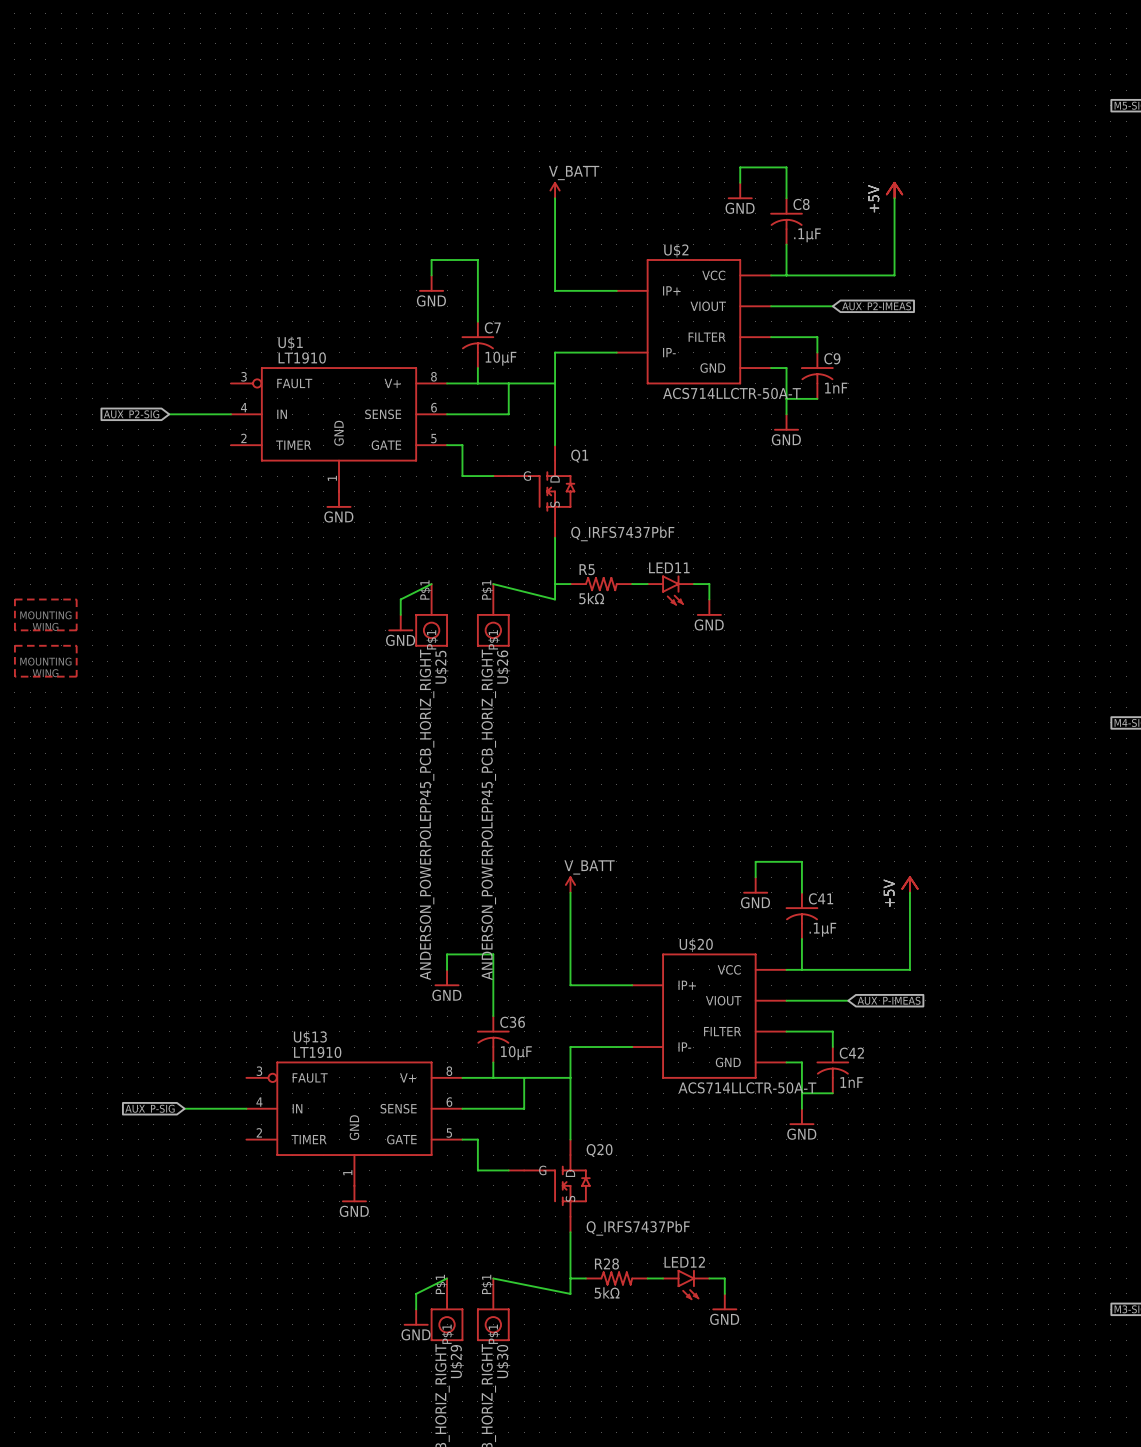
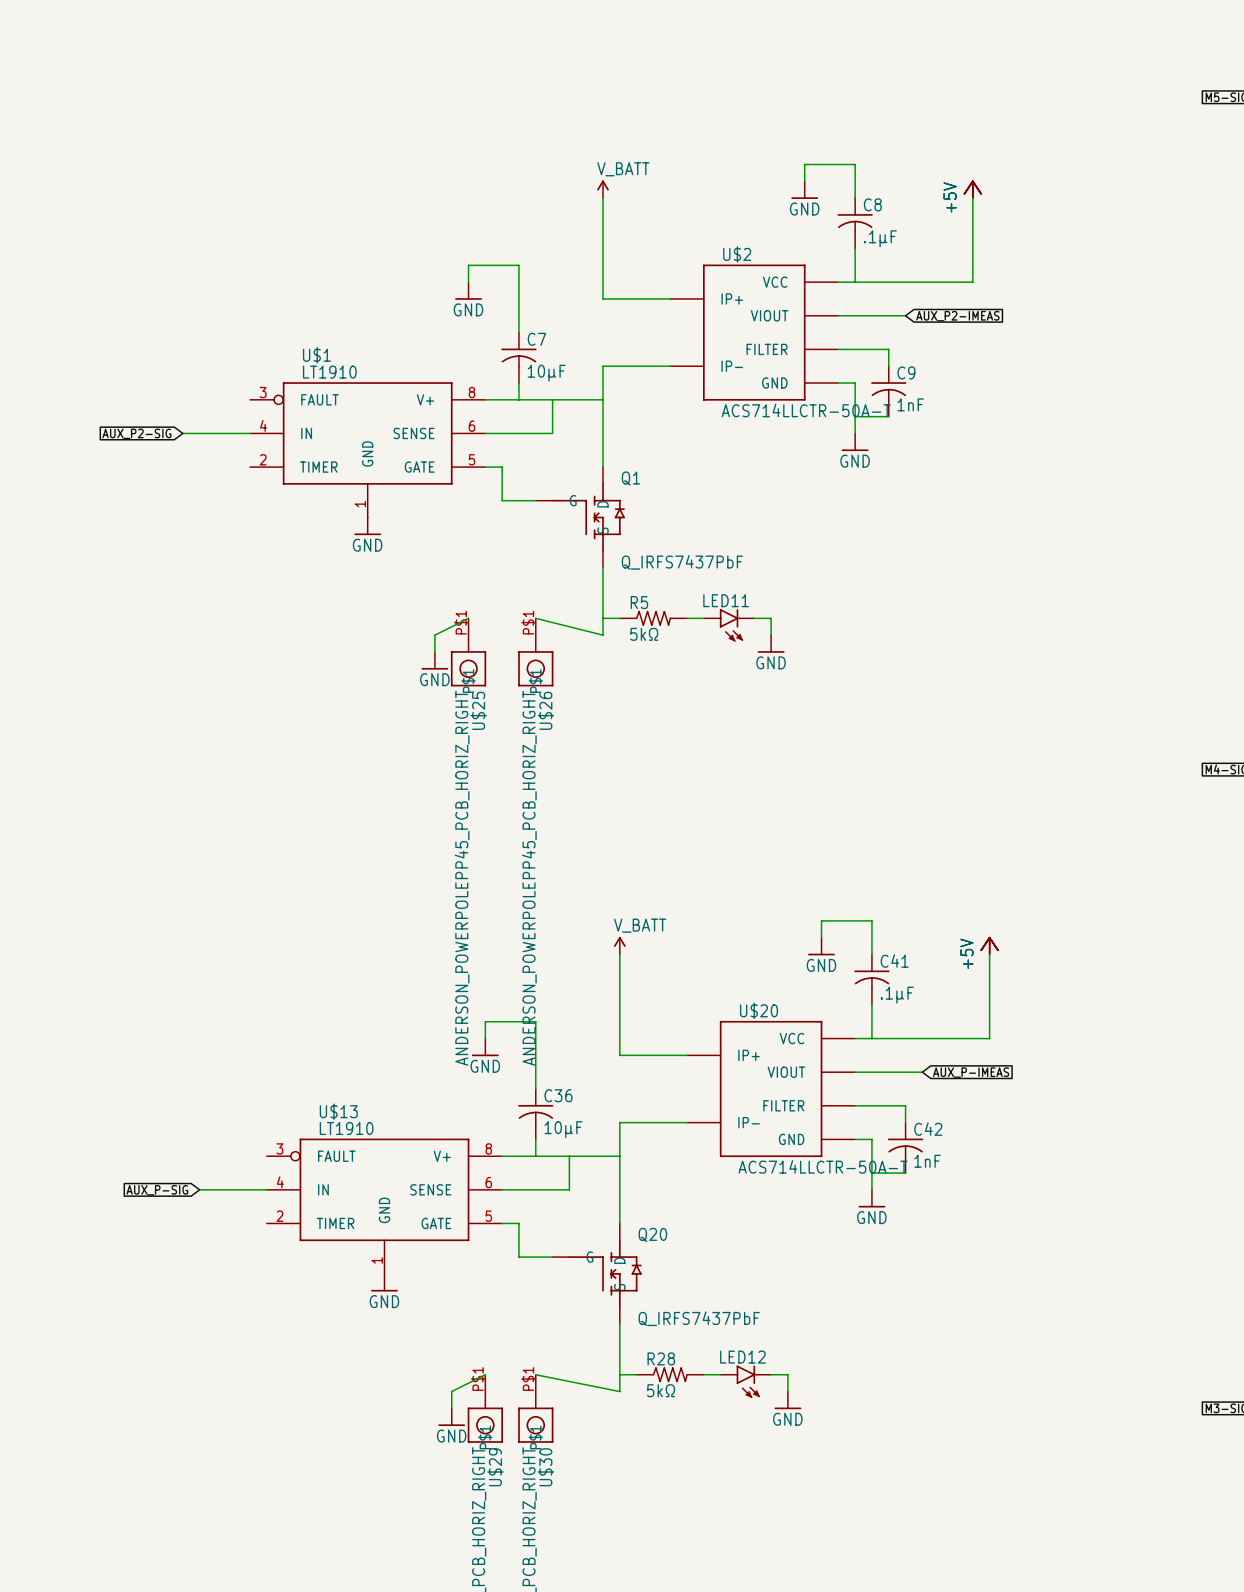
part: (45, 614) -> none
part: (45, 661) -> none

